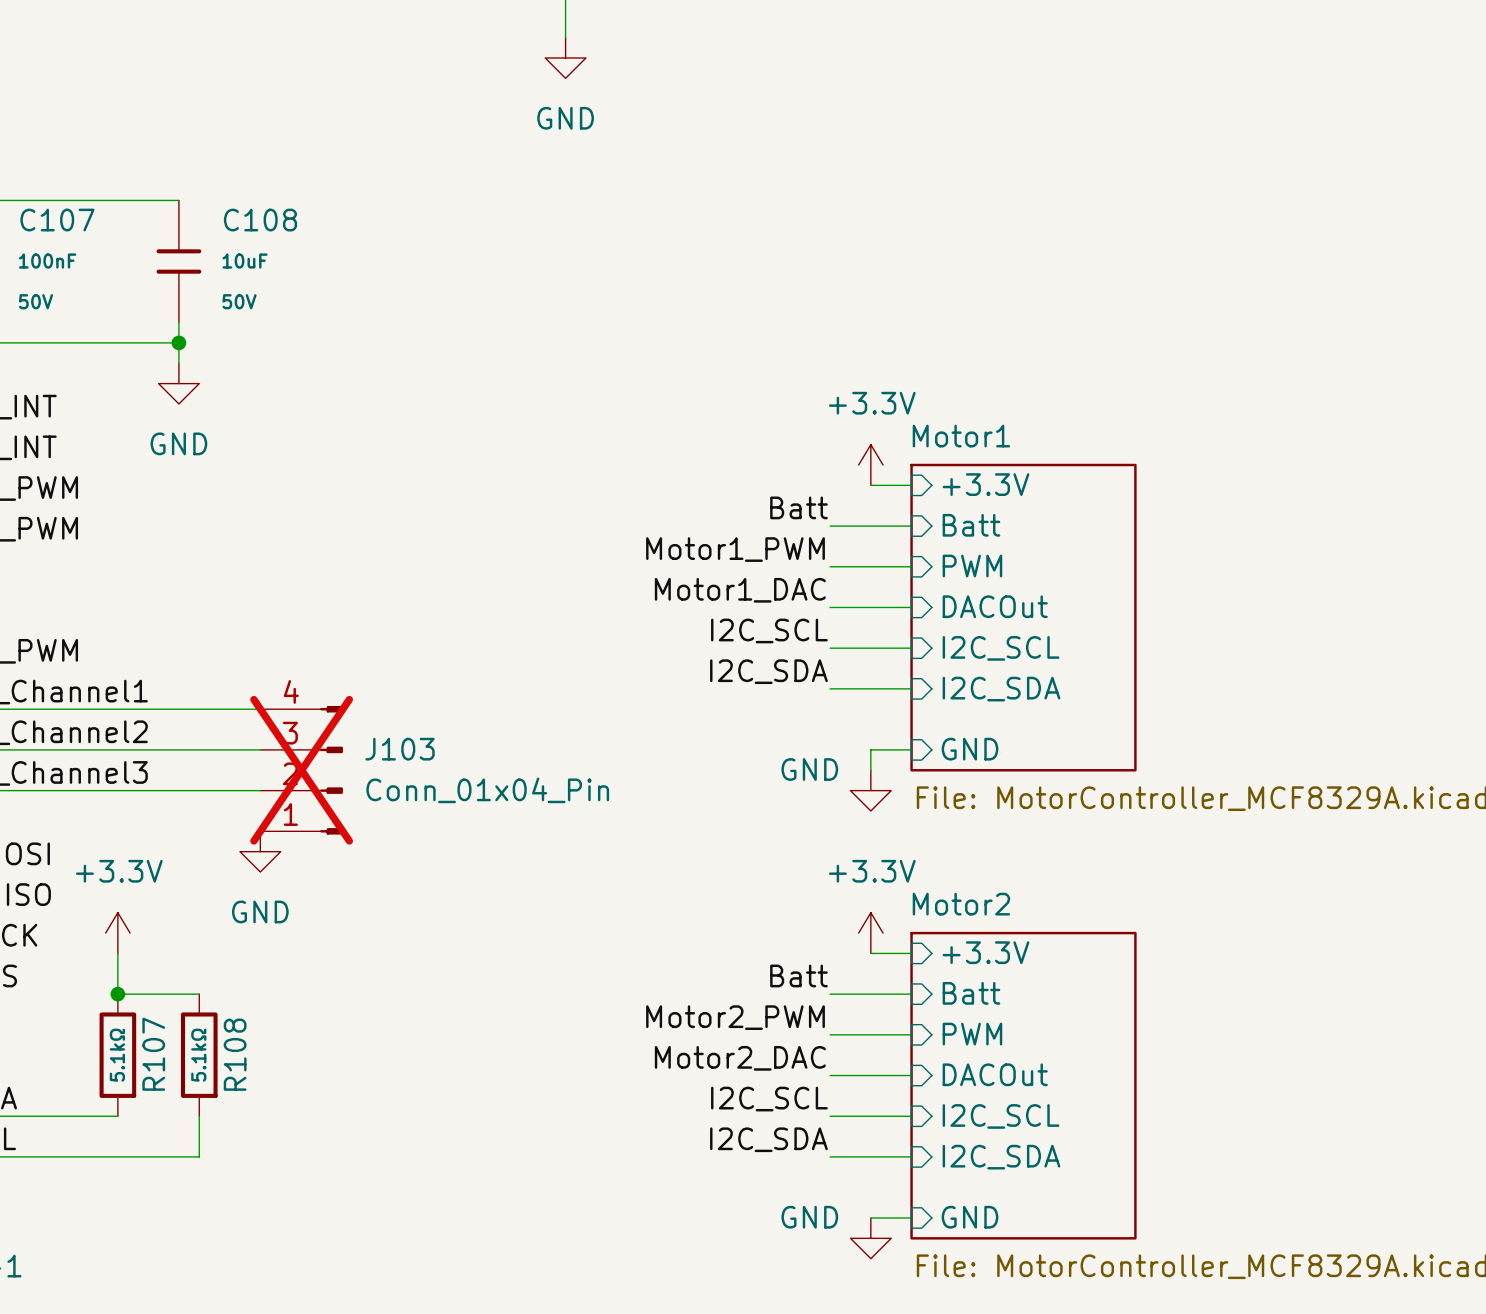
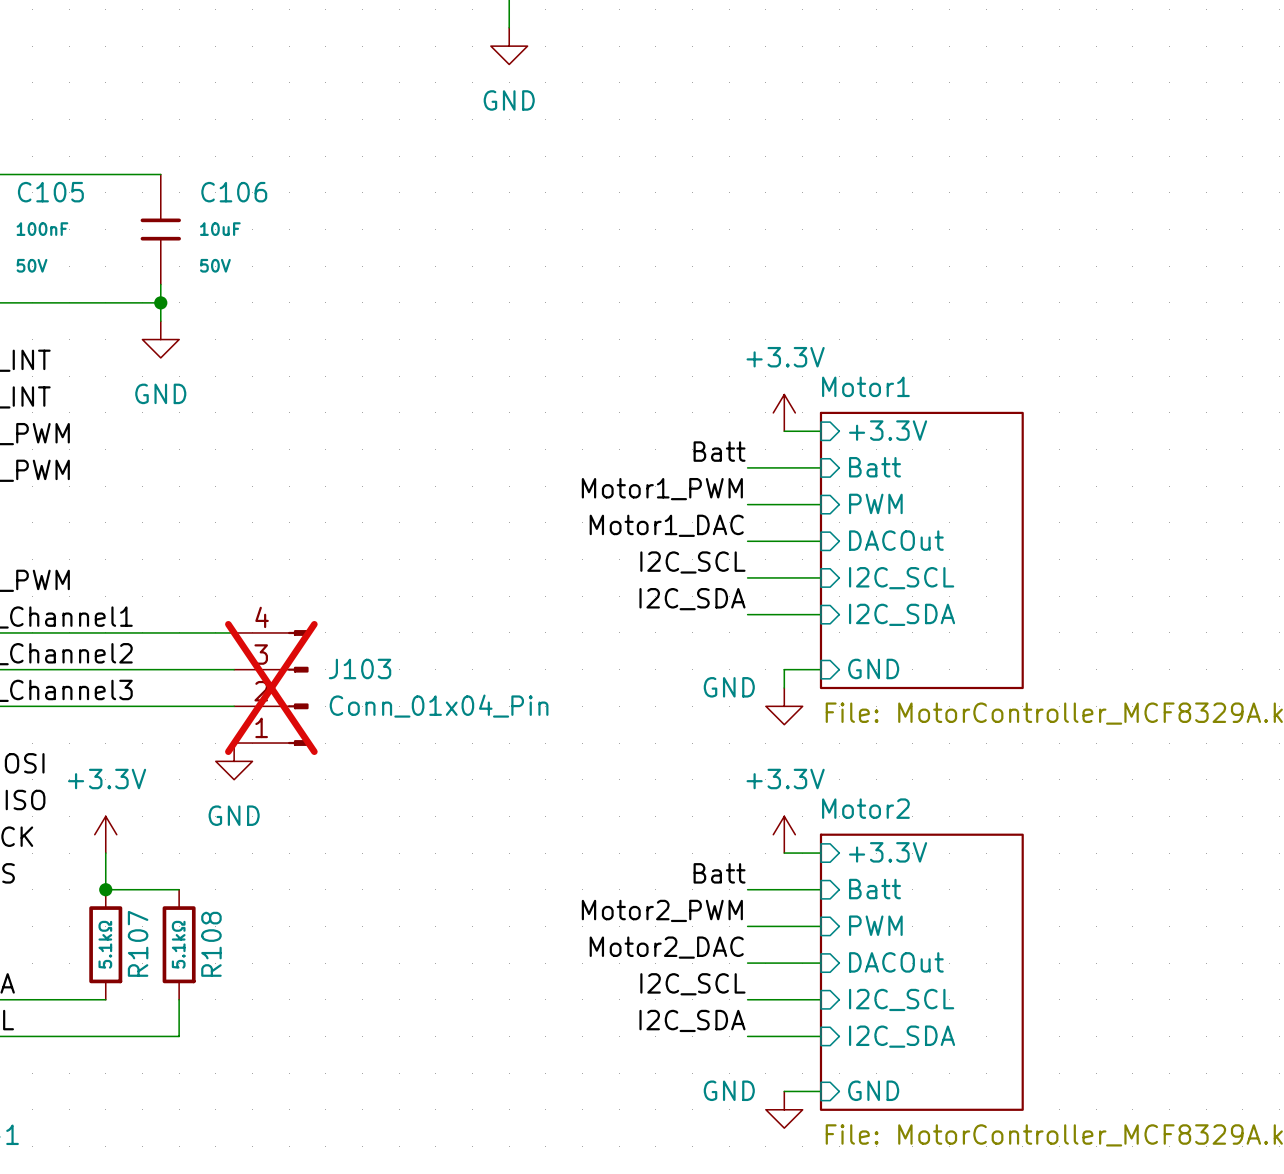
C107 name: C107 (57, 220) -> C105 (50, 192)
C108 name: C108 (260, 220) -> C106 (234, 192)

